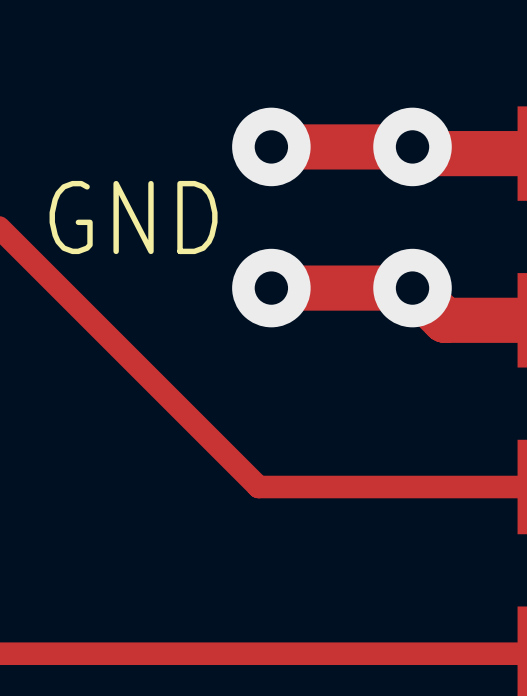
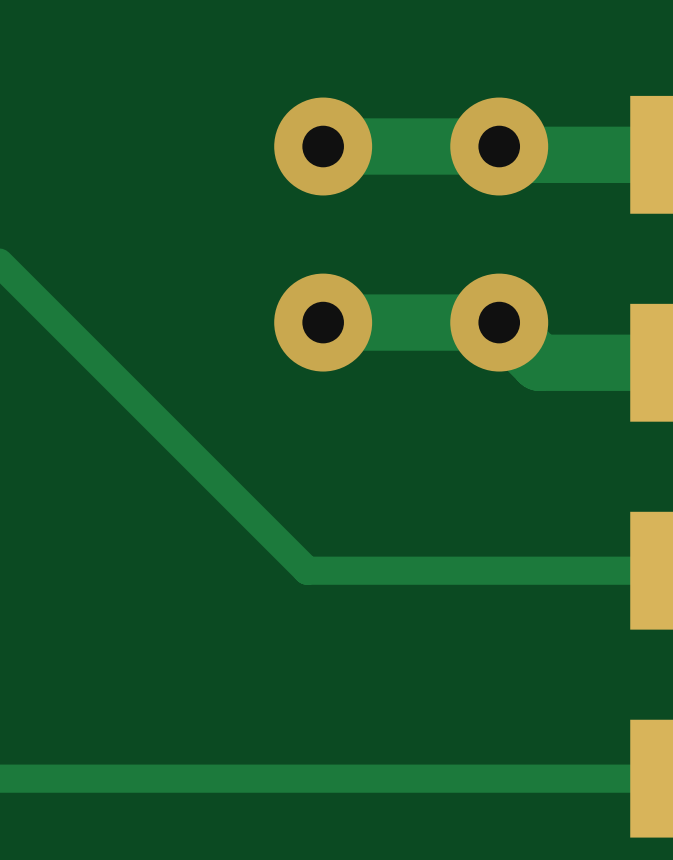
text: GND (133, 217) -> none

